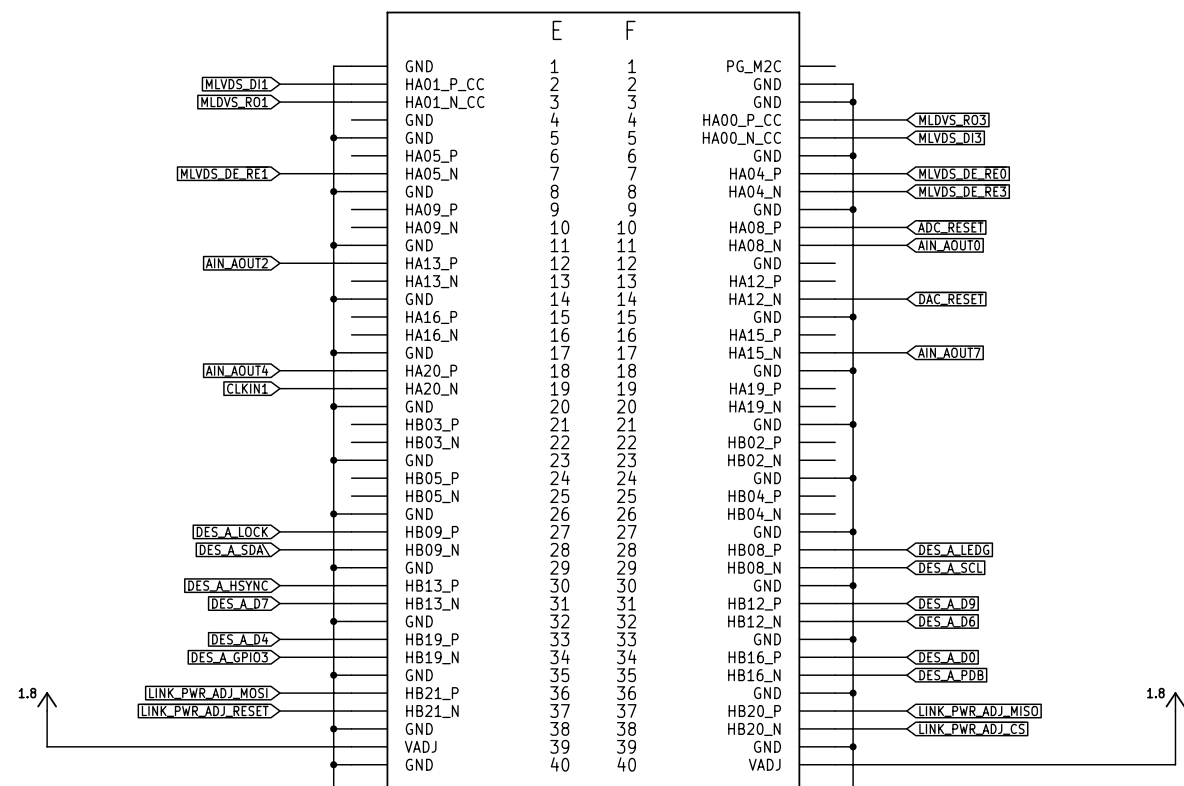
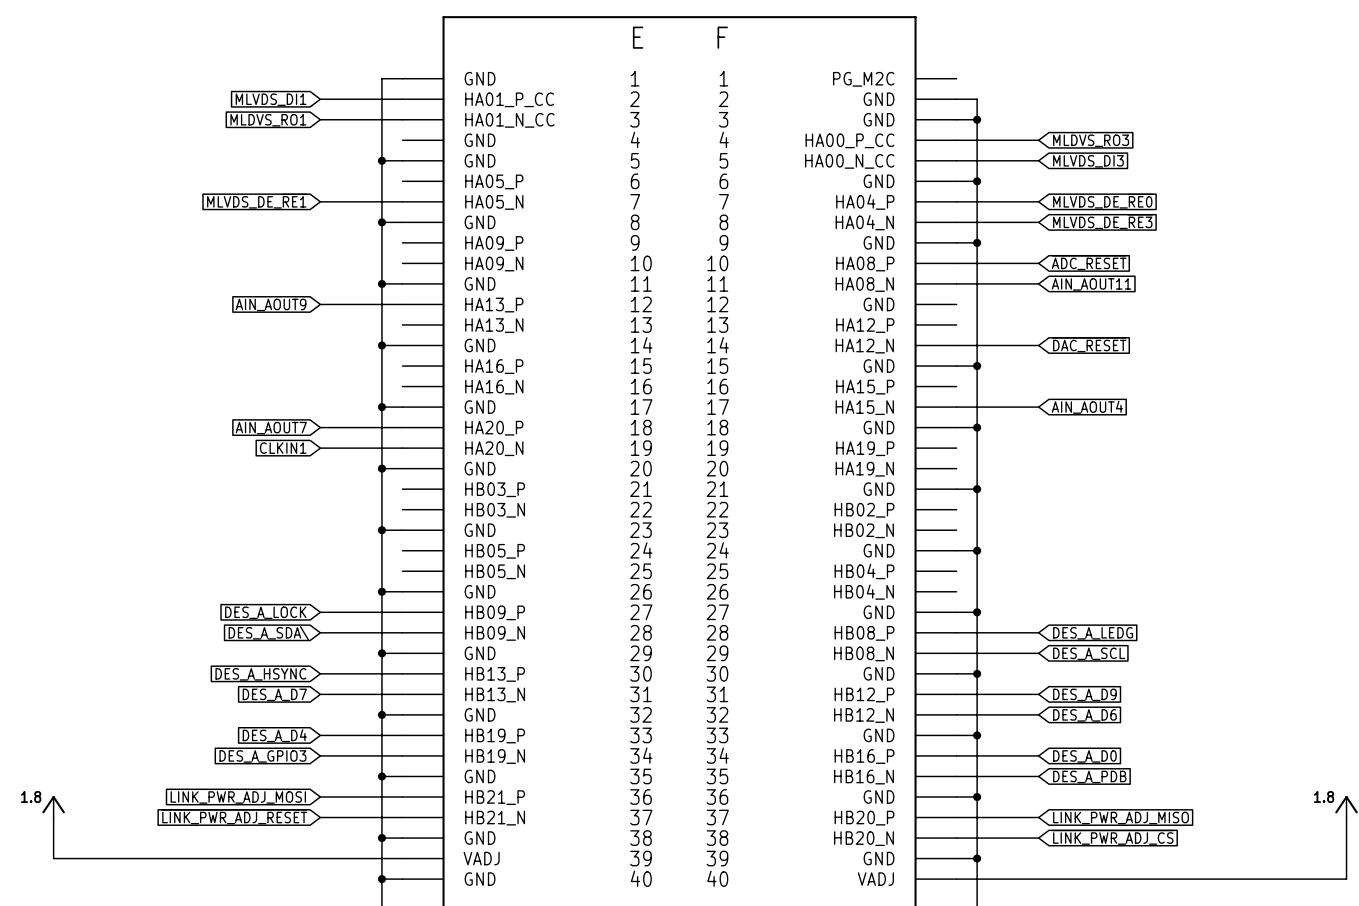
global label: AIN_AOUT0 (949, 245) -> AIN_AOUT11 (1091, 284)
global label: AIN_AOUT2 (236, 263) -> AIN_AOUT9 (271, 304)
global label: AIN_AOUT7 (949, 353) -> AIN_AOUT4 (1087, 407)
global label: AIN_AOUT4 (237, 370) -> AIN_AOUT7 (271, 428)

